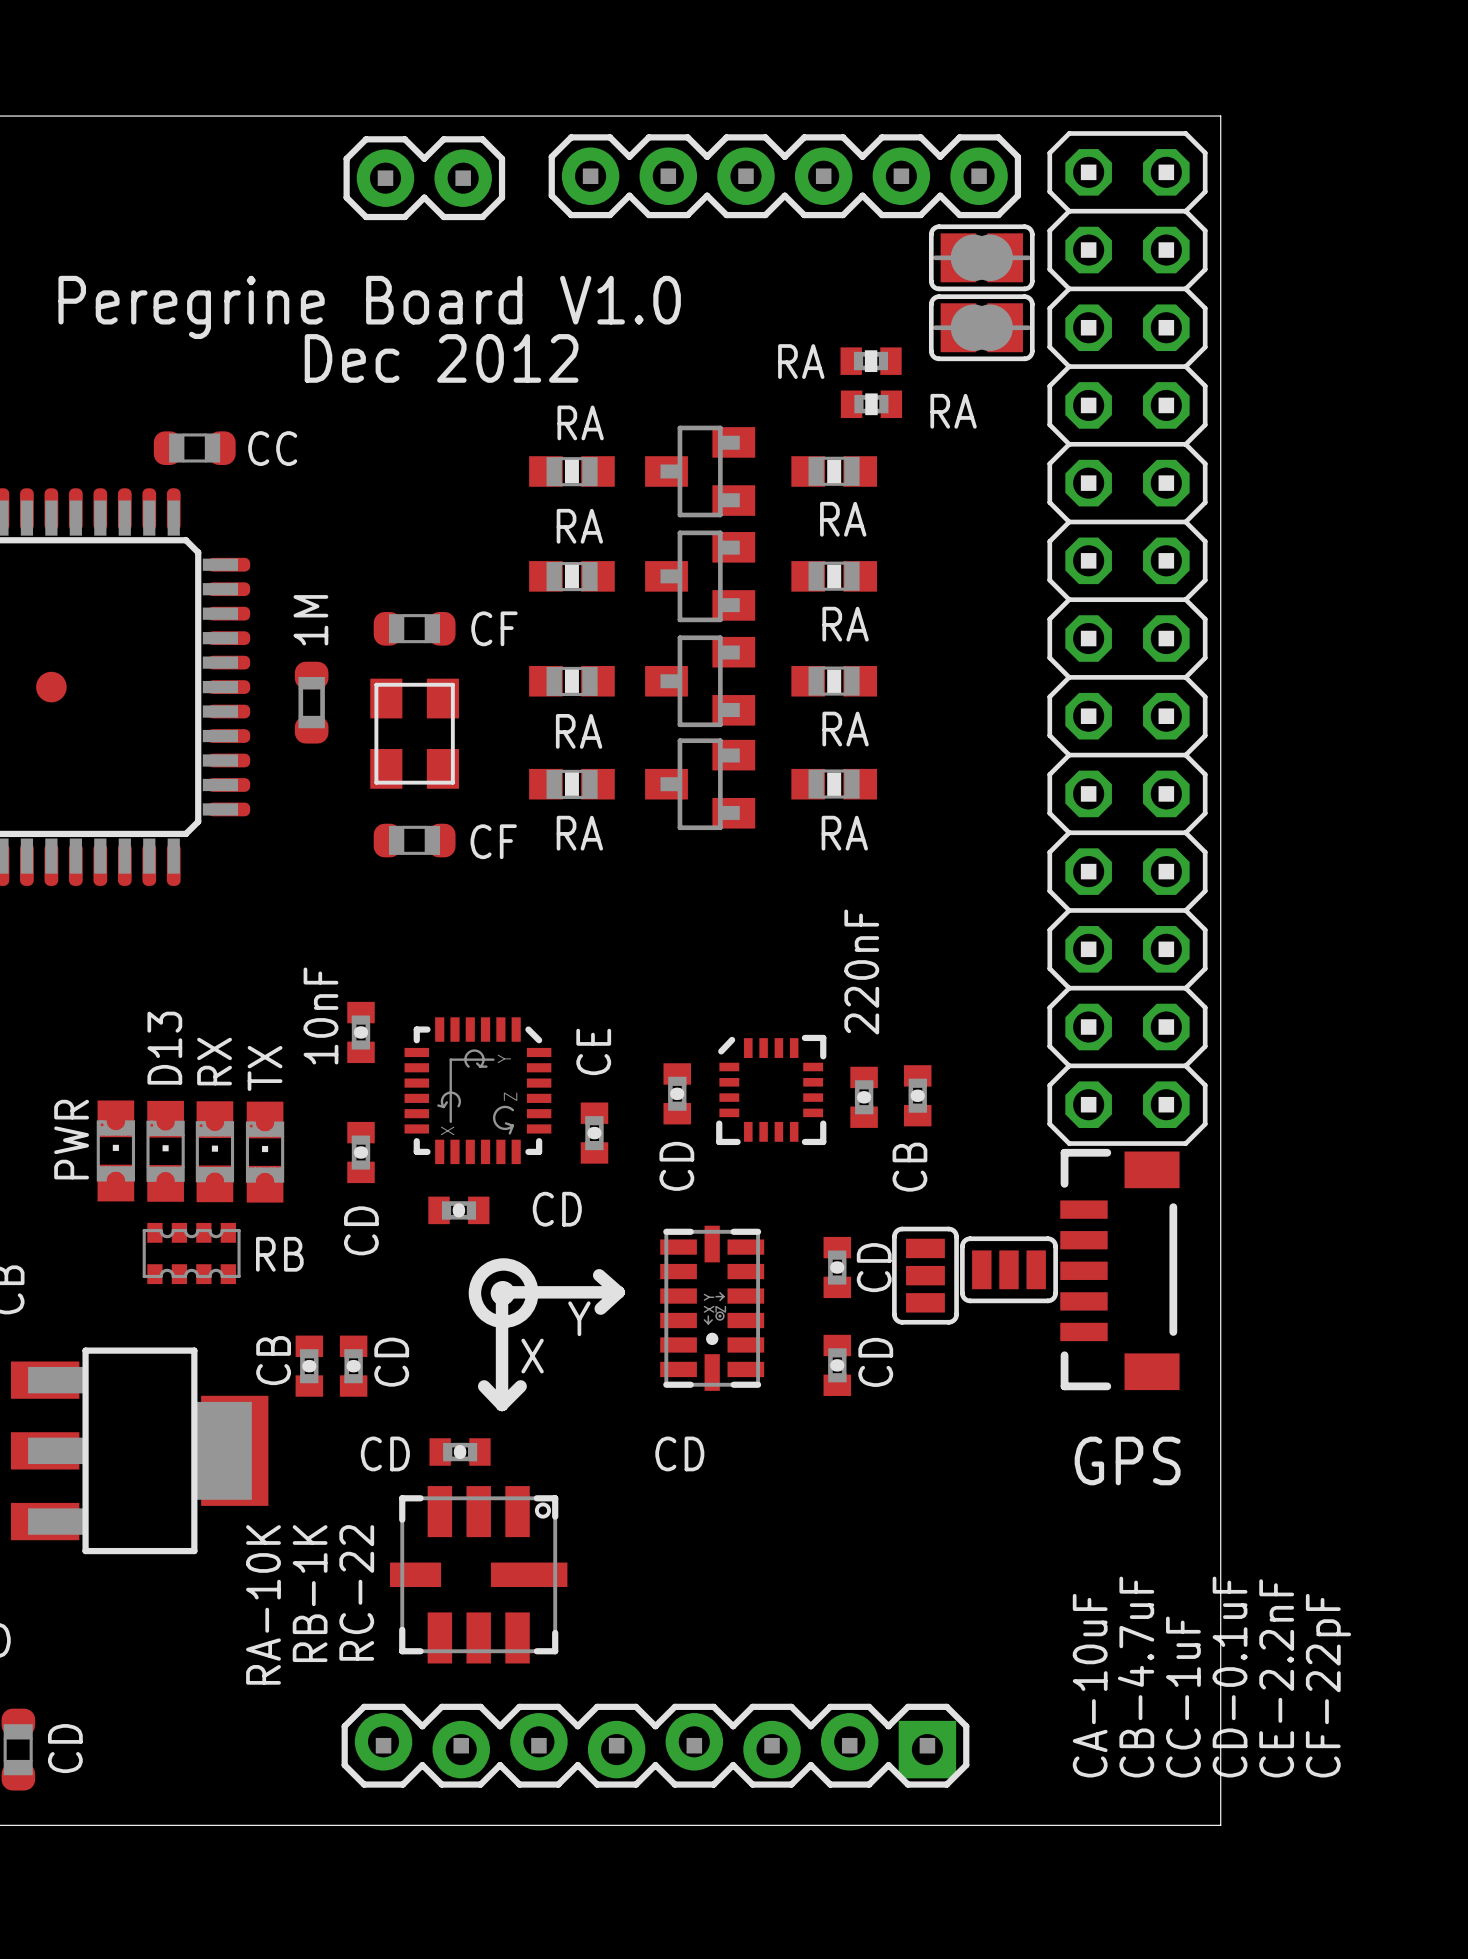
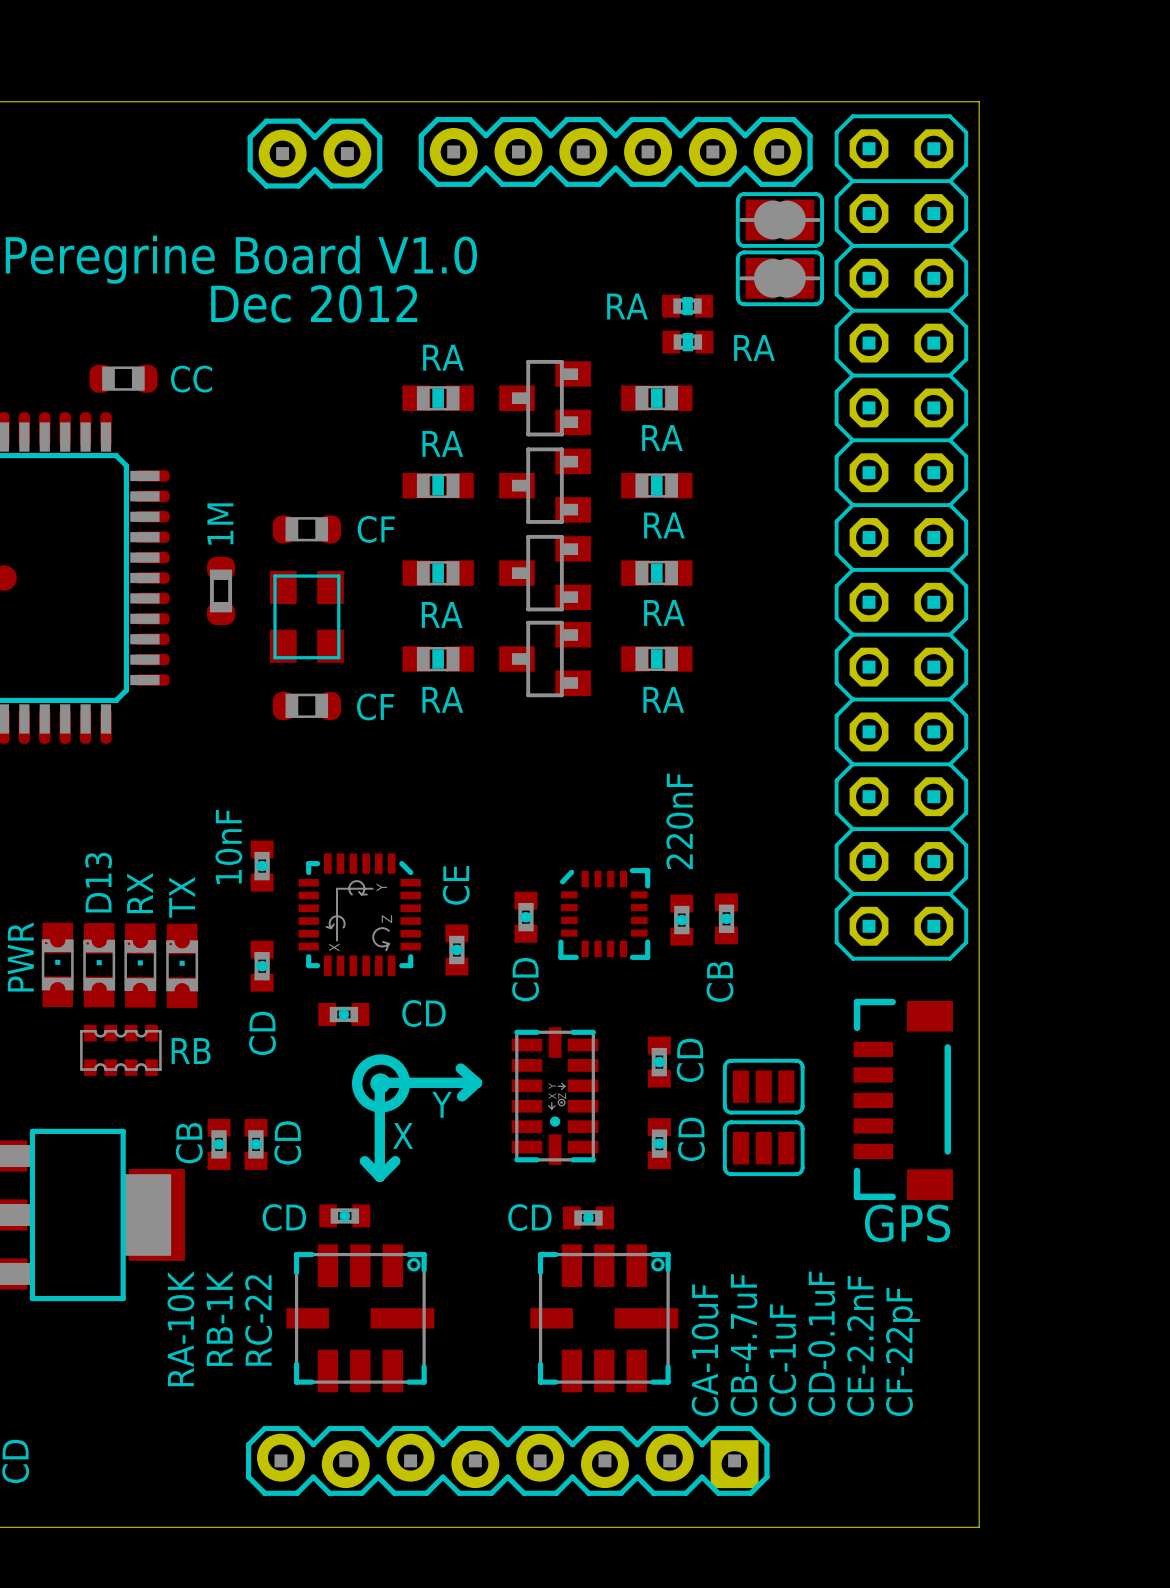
part: (1009, 1269) -> none
part position: (1119, 1269) -> (903, 1099)
part: (925, 1275) -> none
part: none -> (763, 1086)
part: none -> (763, 1148)
part: none -> (588, 1217)
part: none -> (604, 1318)
text position: CB-4.7uF (1136, 1677) -> CB-4.7uF (743, 1345)
text position: CD-0.1uF (1230, 1677) -> CD-0.1uF (821, 1343)
text position: CE-2.2nF (1276, 1678) -> CE-2.2nF (860, 1345)
text position: CA-10uF (1090, 1685) -> CA-10uF (705, 1350)
text position: CF-22pF (1328, 1685) -> CF-22pF (902, 1351)
text position: CC-1uF (1183, 1697) -> CC-1uF (782, 1360)

